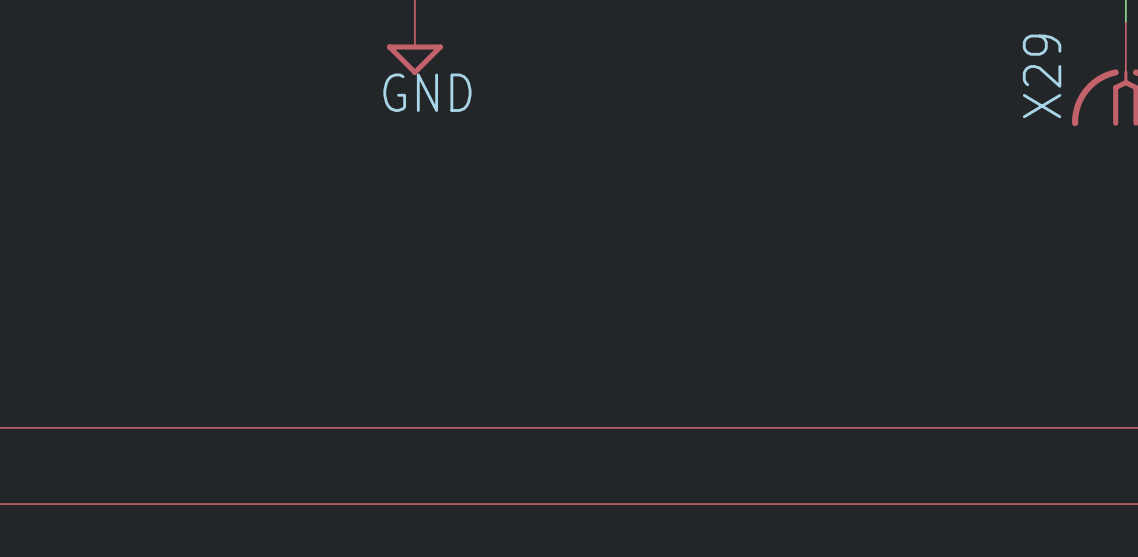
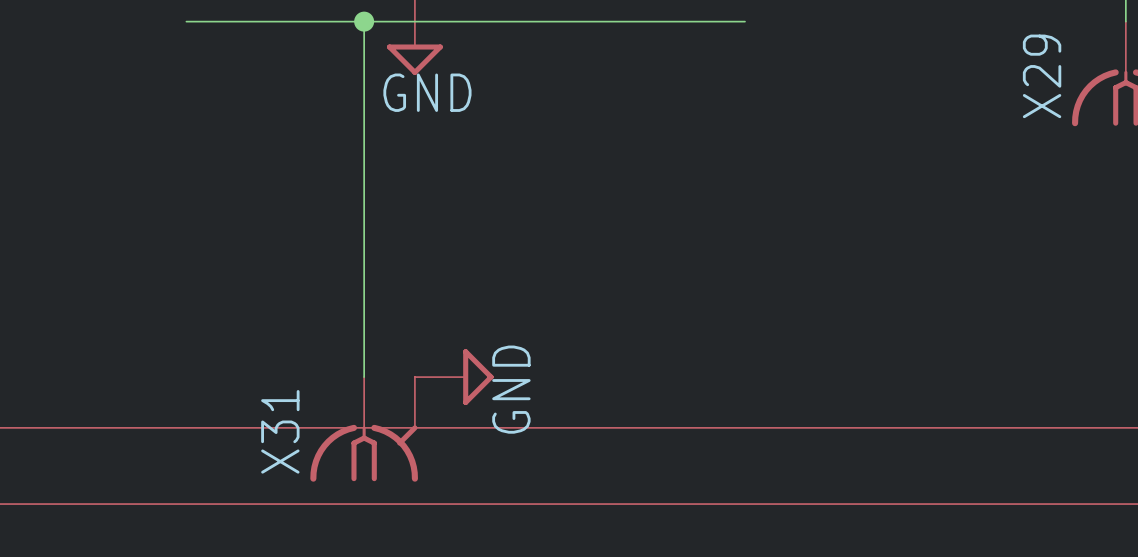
wire: none -> (186, 21) (745, 21)
wire: none -> (364, 21) (364, 377)
junction: none -> (364, 21)
power symbol: none -> GND (454, 377)
X31: none -> (364, 429)

